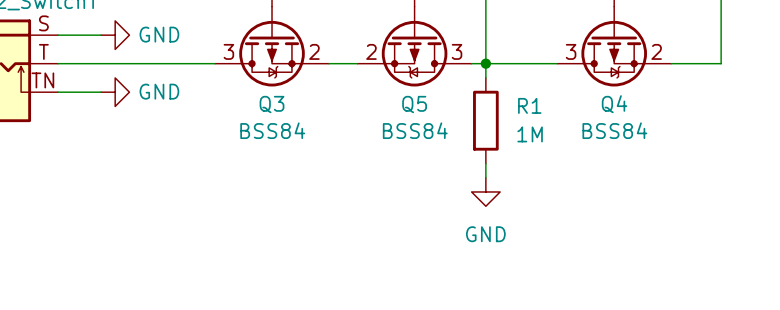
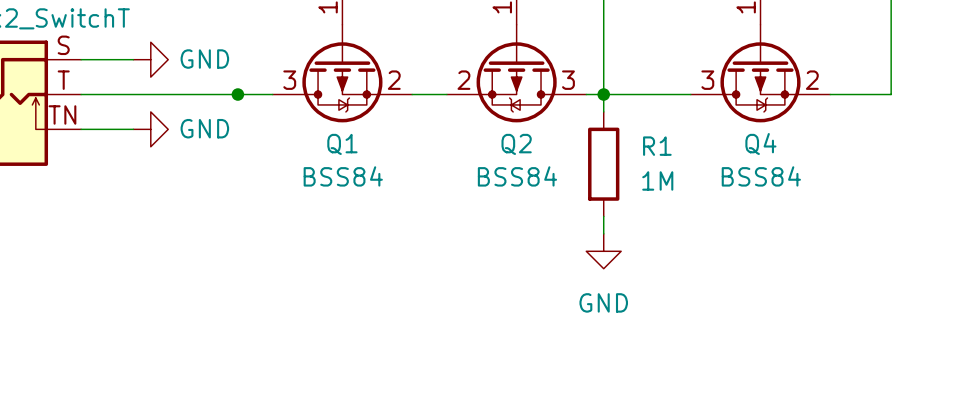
junction: none -> (237, 94)
Q3 name: Q3 (272, 104) -> Q1 (342, 144)
Q5 name: Q5 (414, 104) -> Q2 (516, 144)

